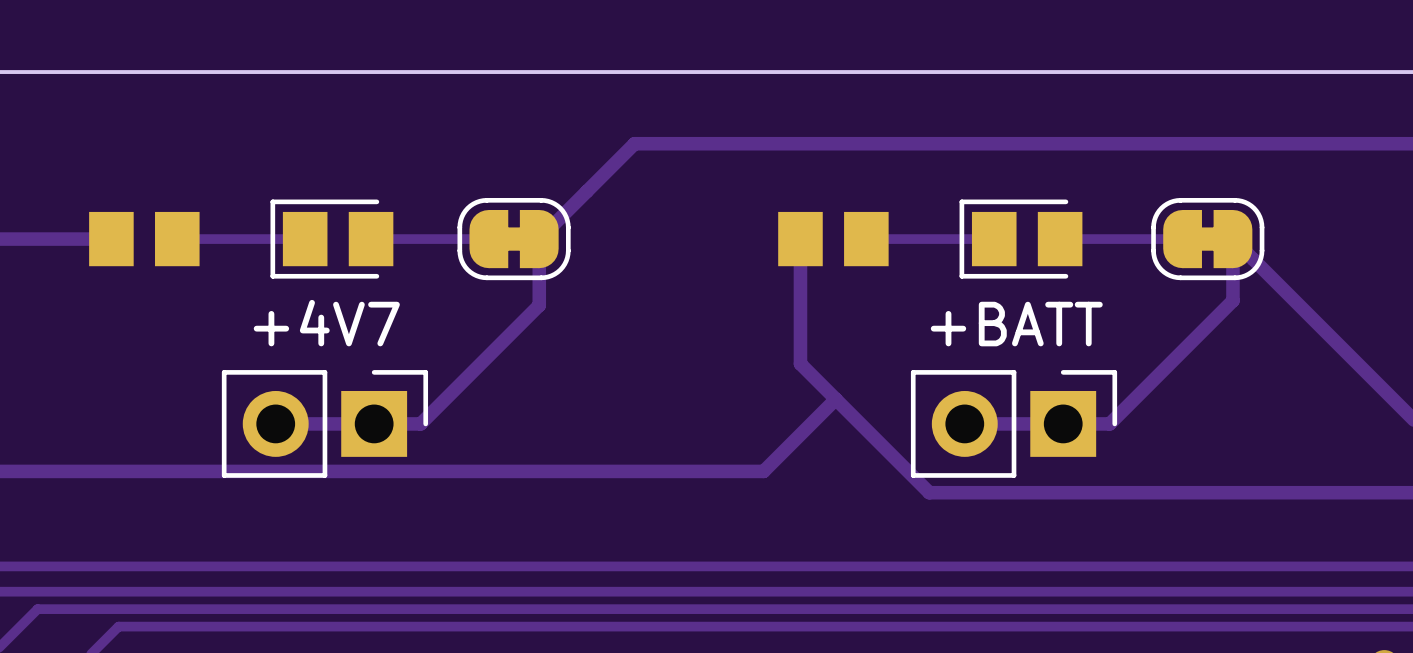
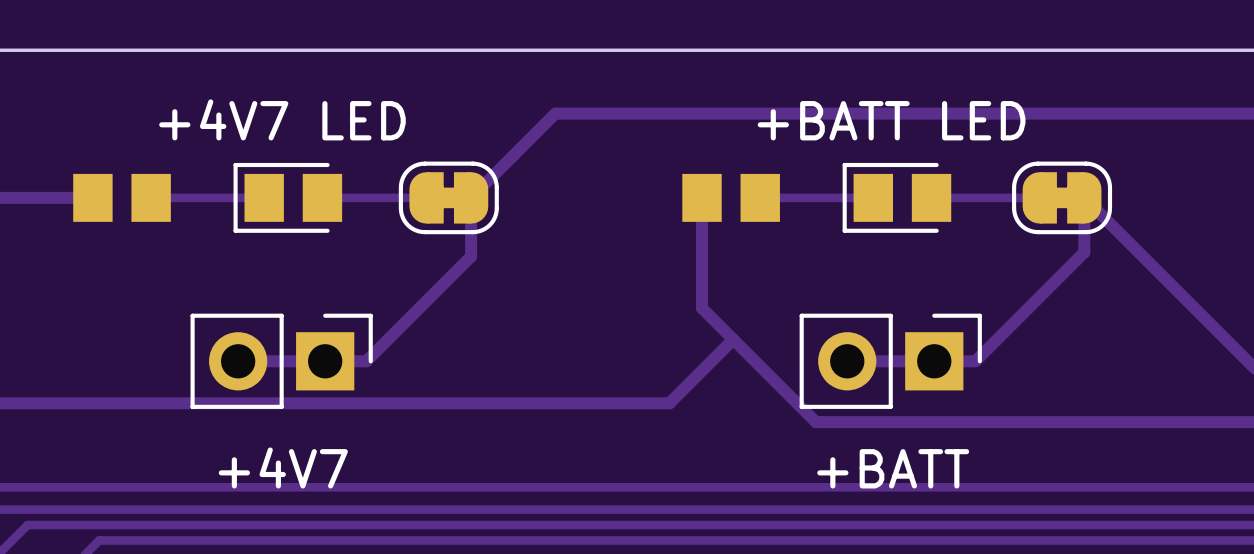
text: none -> +4V7 LED (282, 119)
text: none -> +BATT LED (891, 120)
text position: +4V7 (326, 323) -> +4V7 (283, 467)
text position: +BATT (1016, 324) -> +BATT (893, 468)

